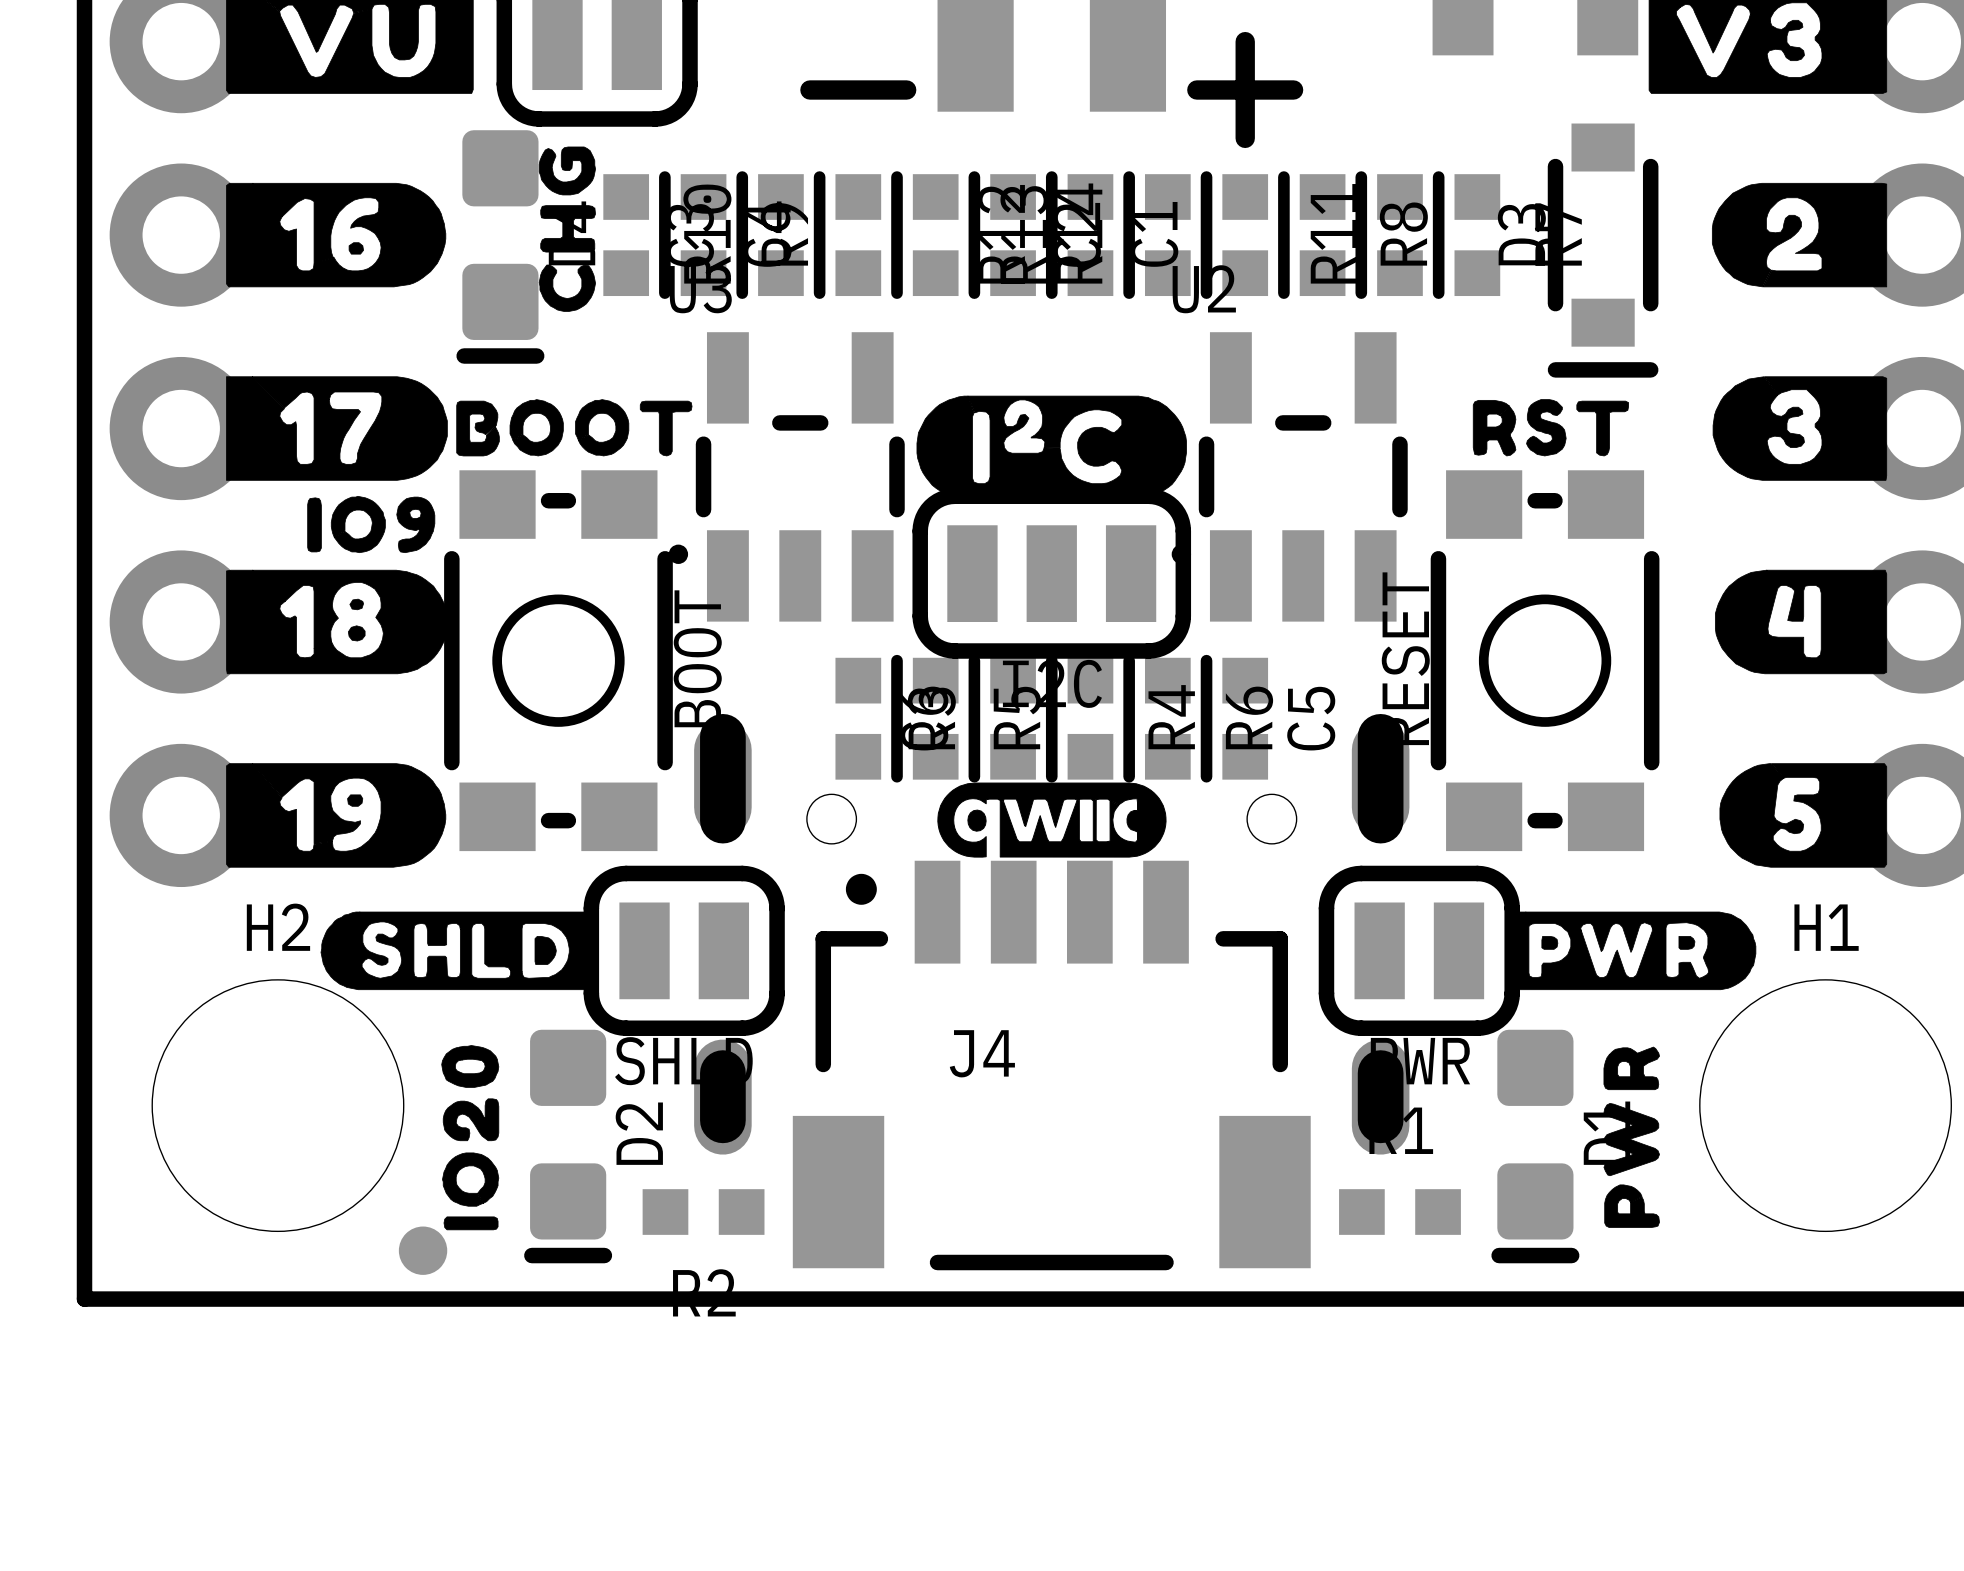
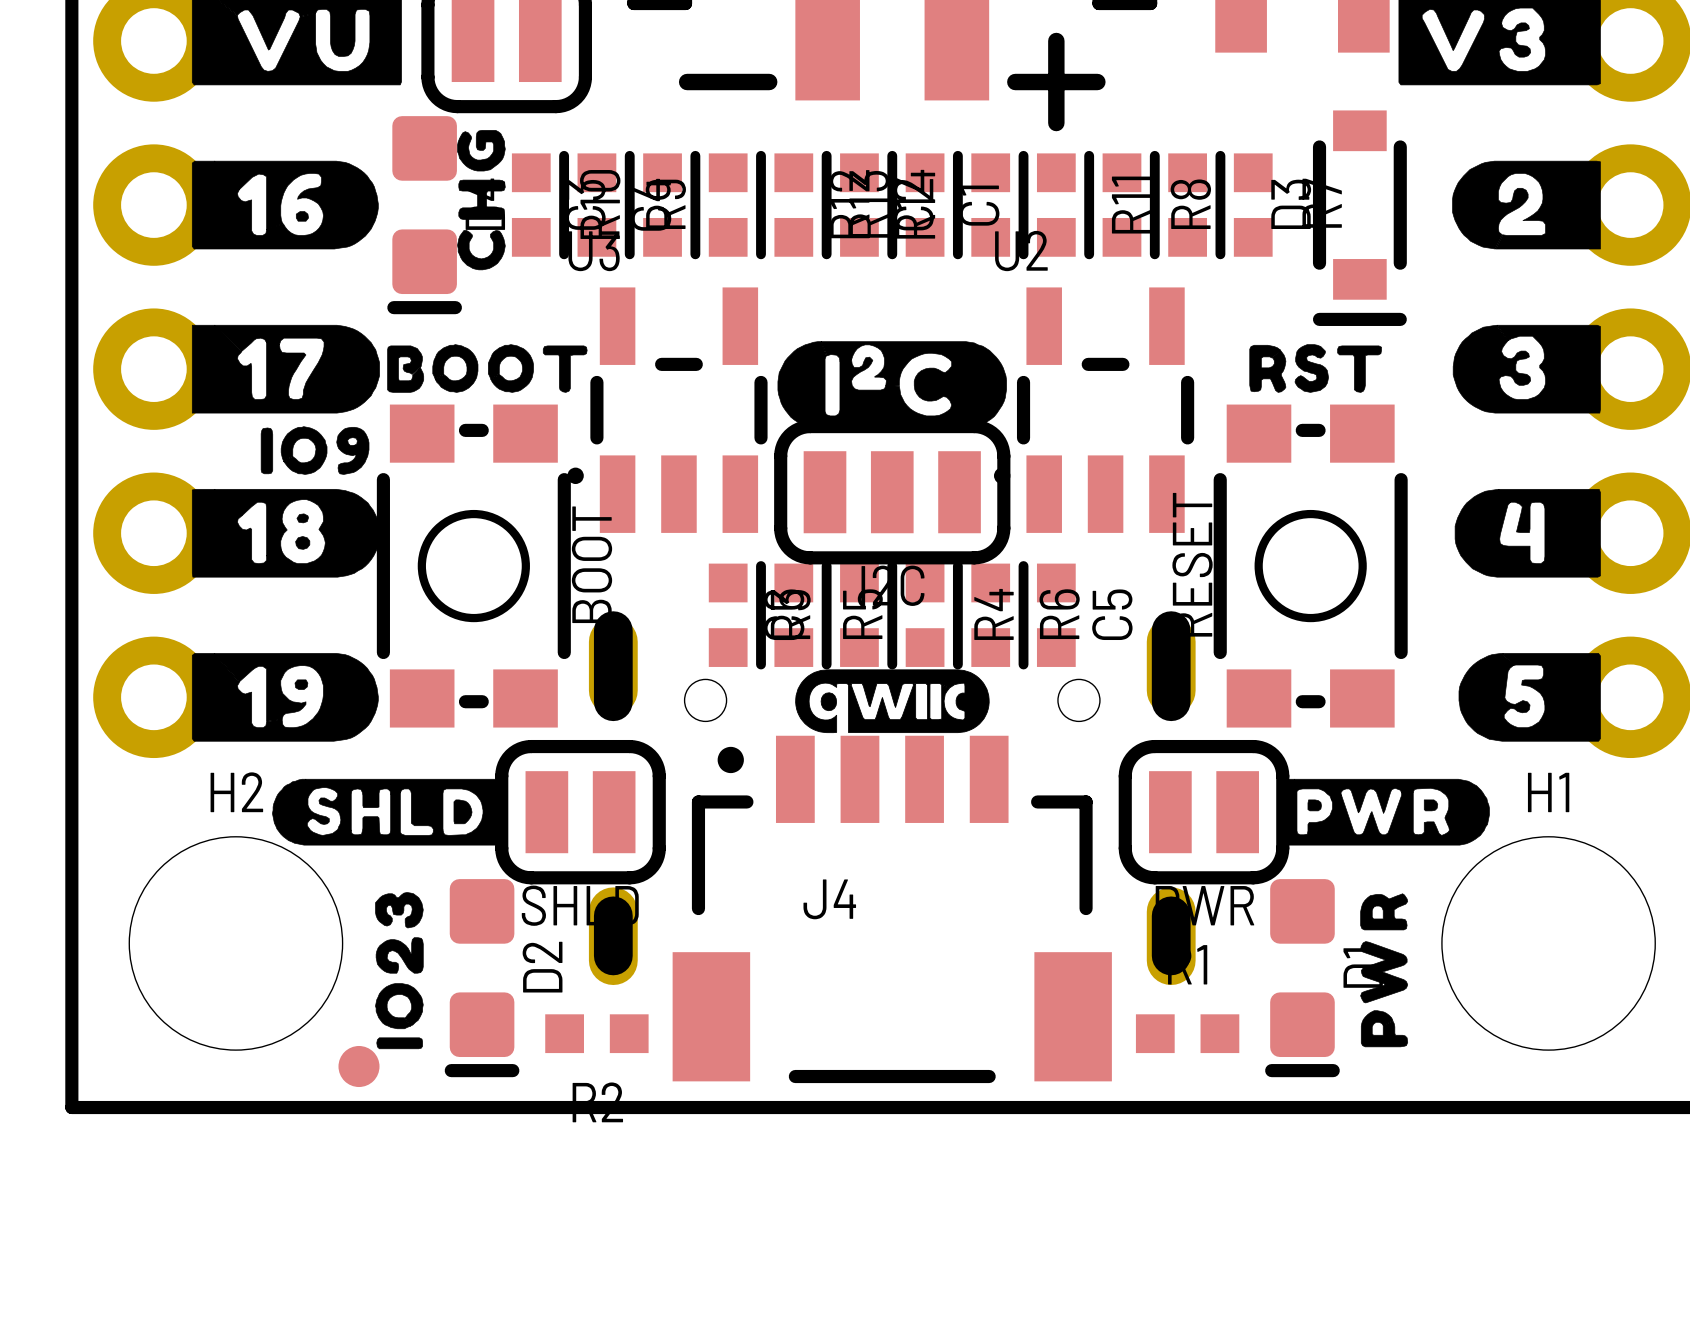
drawing shape: [441, 1045, 500, 1231] -> [375, 892, 424, 1050]

